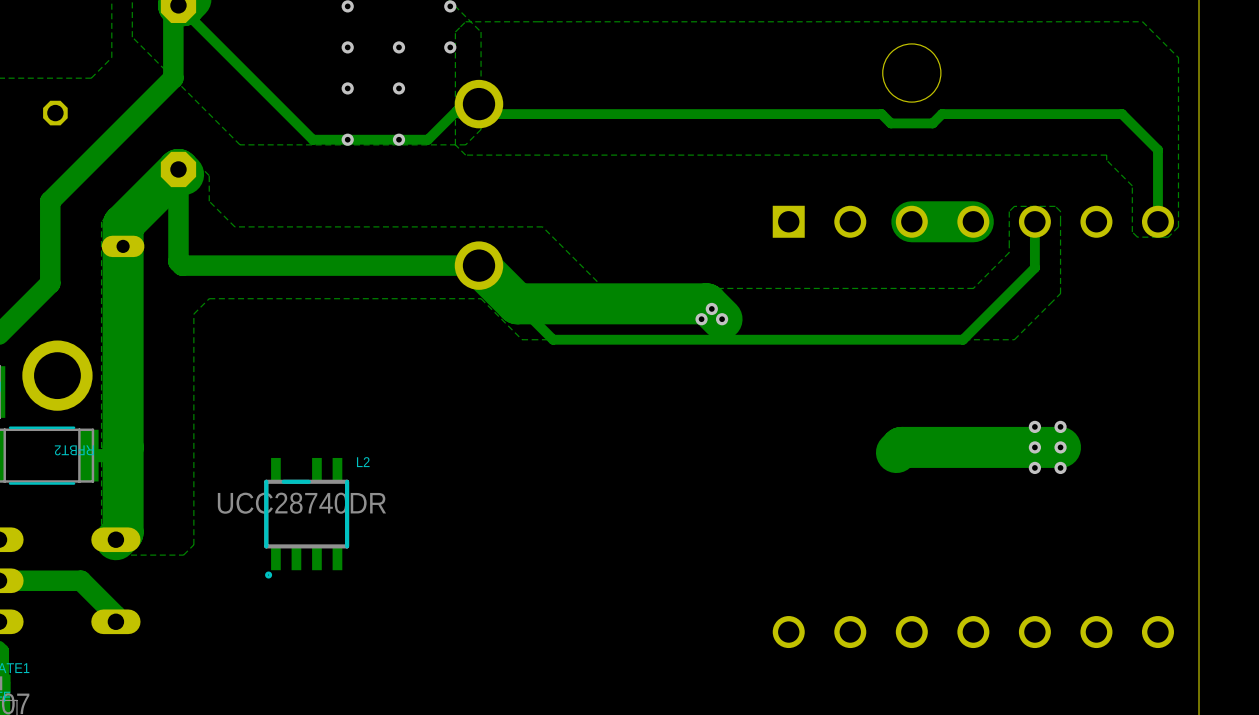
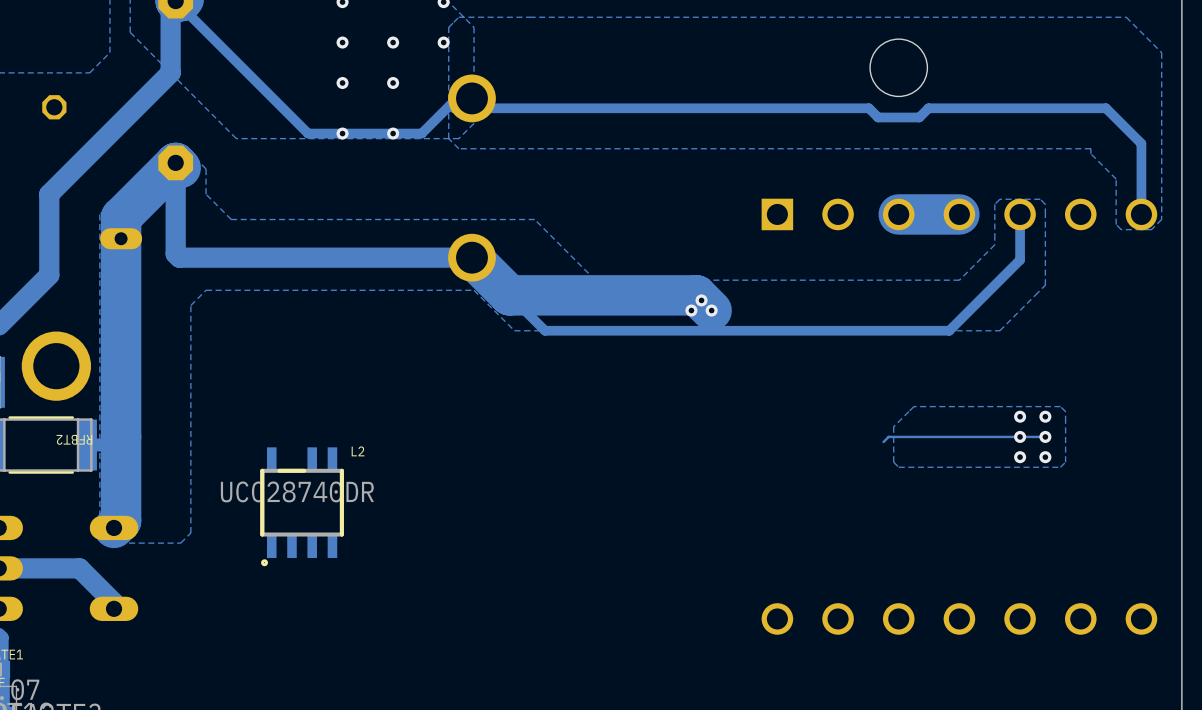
zone outline: none -> (1060, 406) (1065, 411) (1065, 462) (1060, 467) (898, 467) (893, 462) (893, 426) (913, 406) (1060, 406)
track width: thick (1060, 447) (901, 447) (896, 452) -> thin (1045, 436) (888, 436) (883, 441)

